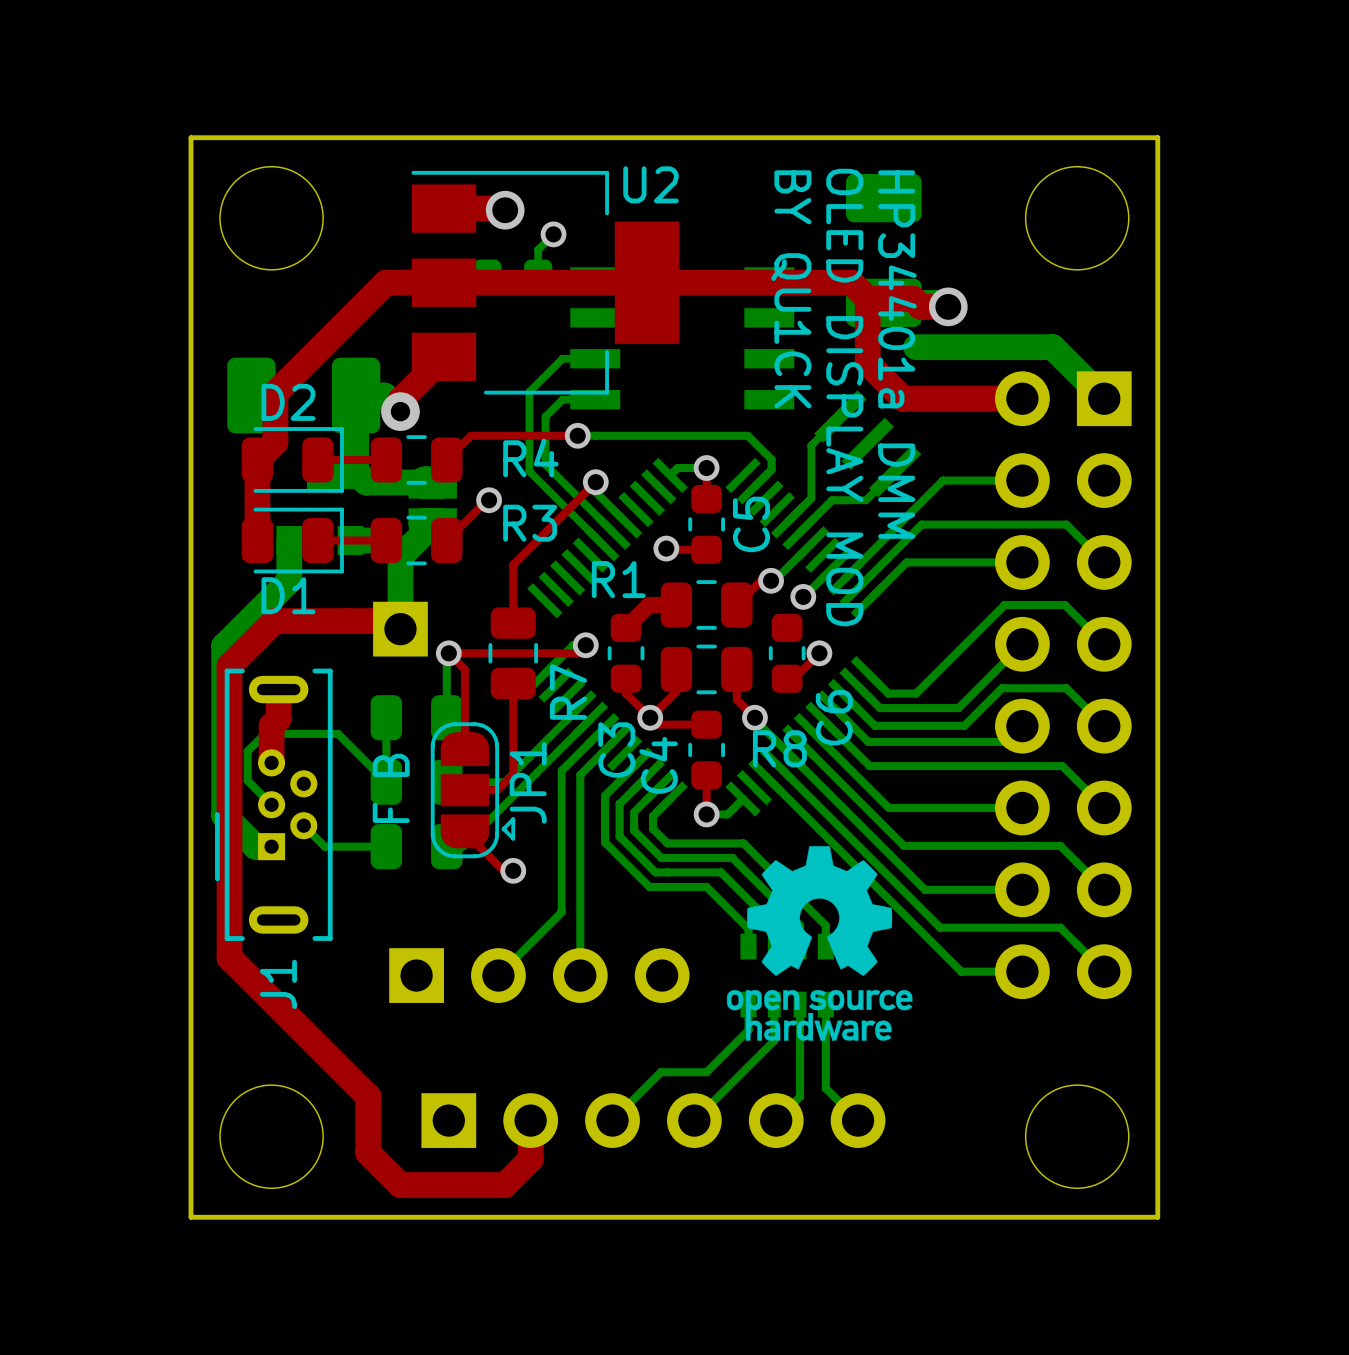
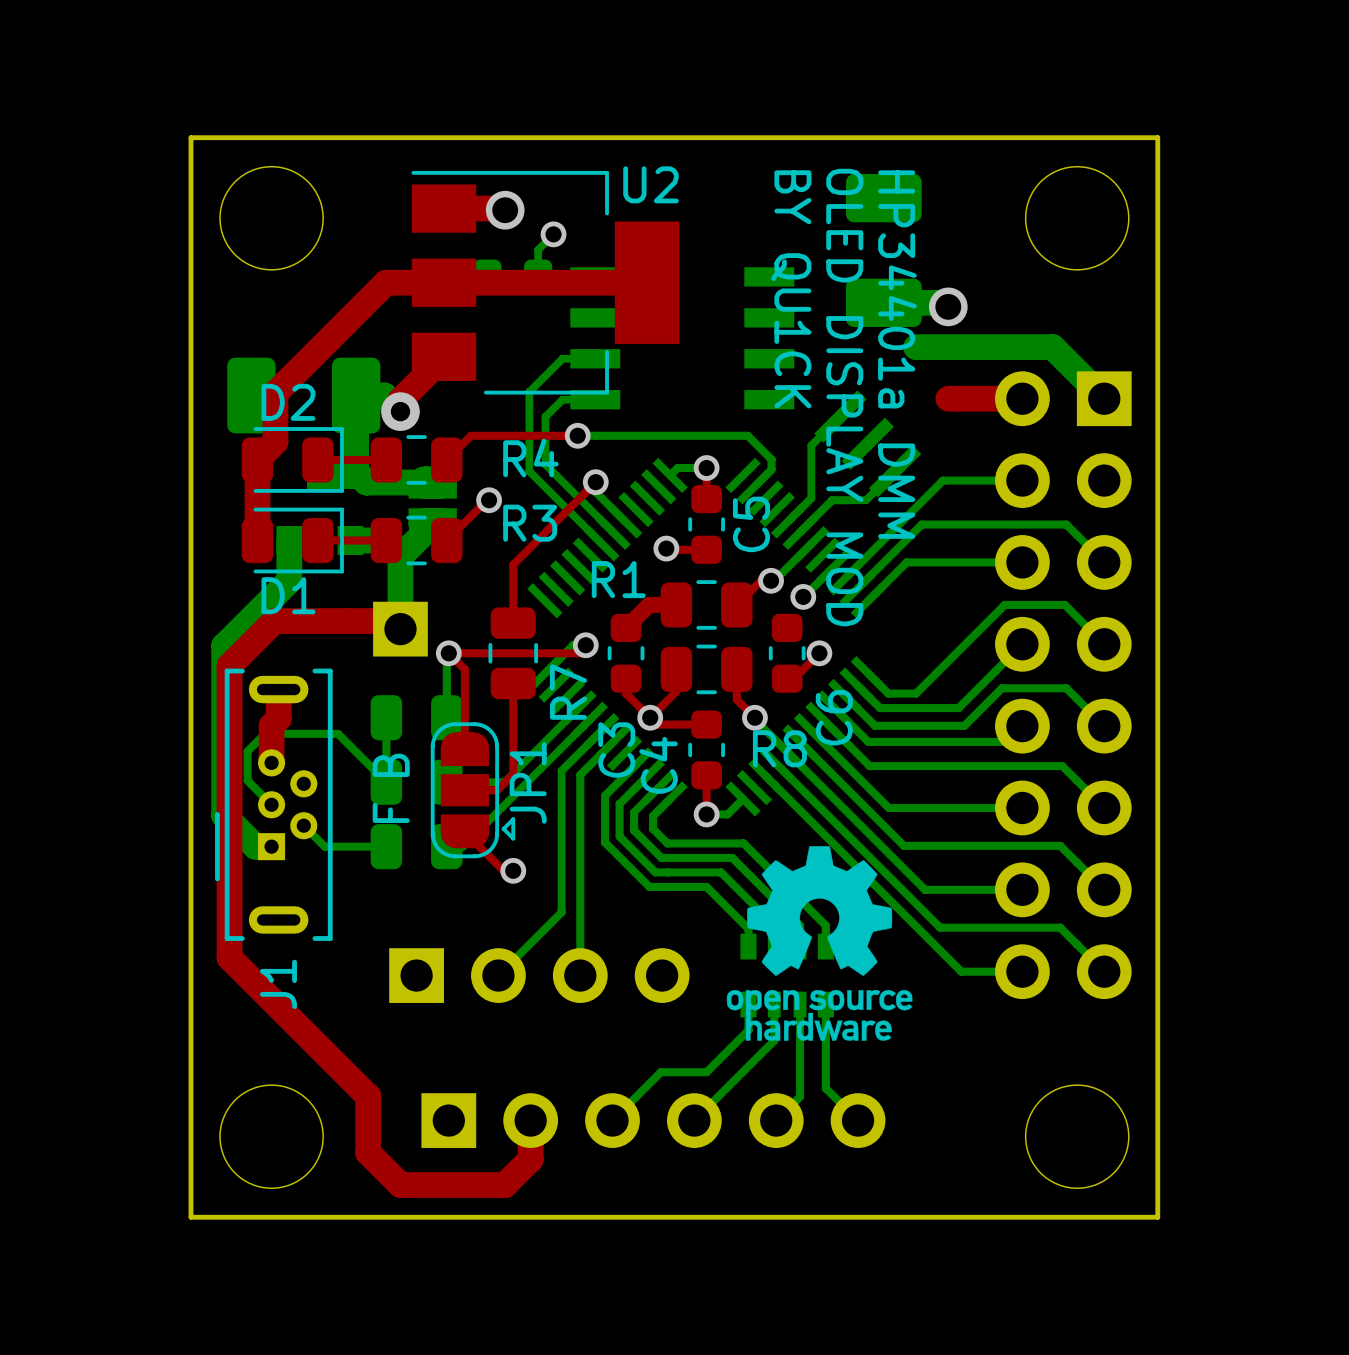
top track: (647, 282) (851, 282) (867, 298) -> none
top track: (867, 298) (867, 363) (903, 398) (948, 398) -> none
top track: (867, 298) (912, 298) (920, 306) (948, 306) -> none

